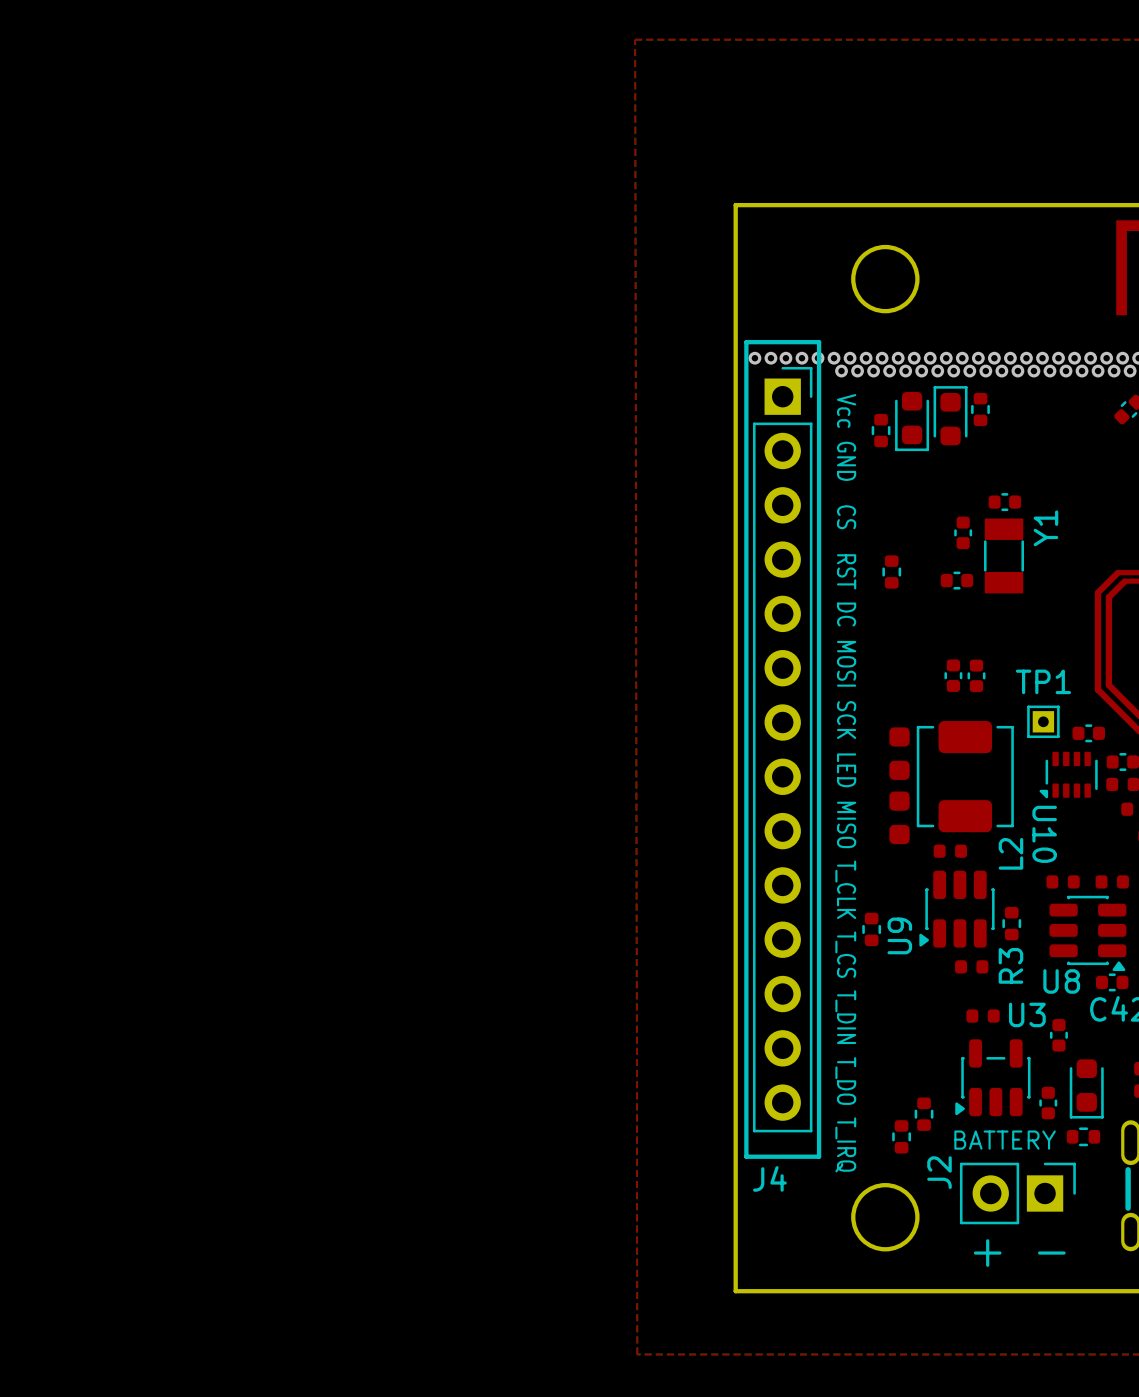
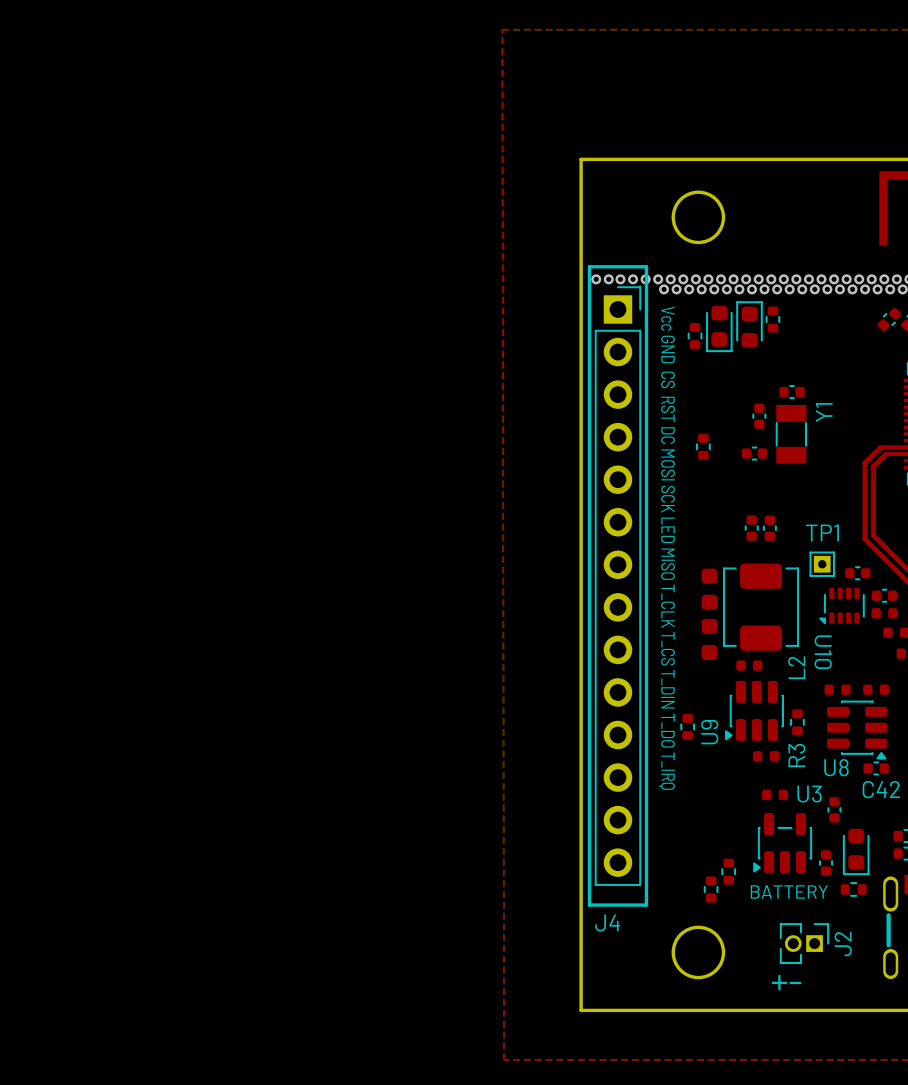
J2 footprint: [959, 1162, 1076, 1225] -> [779, 923, 830, 965]
J2 name position: J2 (939, 1172) -> J2 (843, 943)
text: + - (1019, 1253) -> +- (786, 982)

